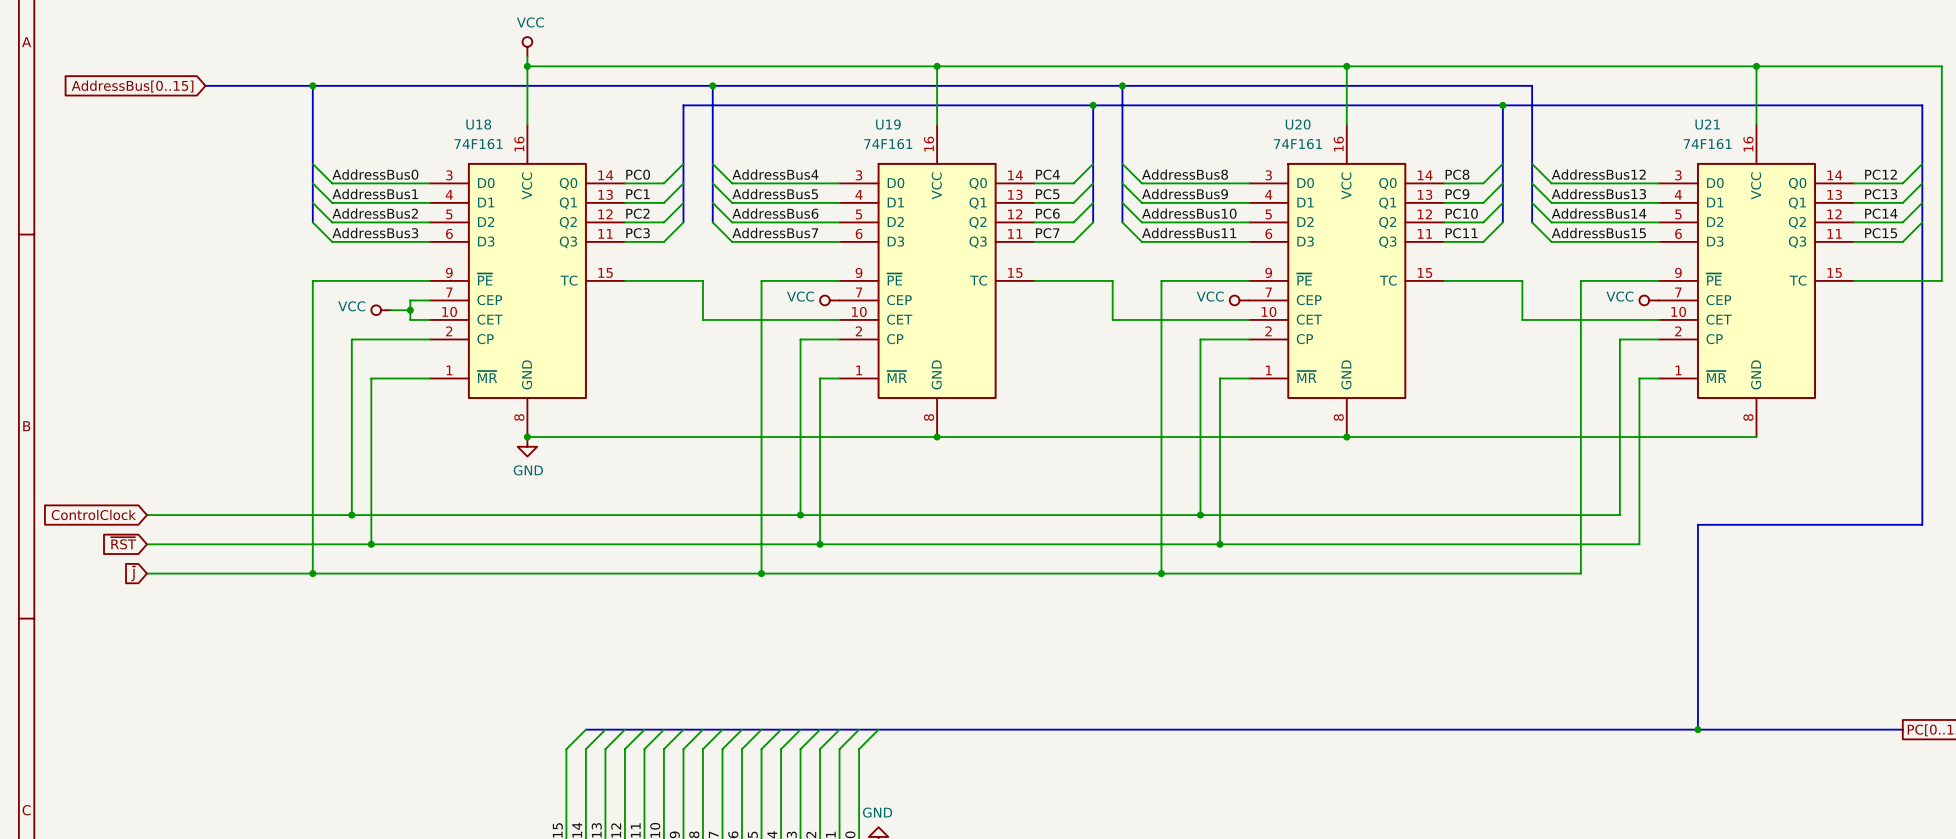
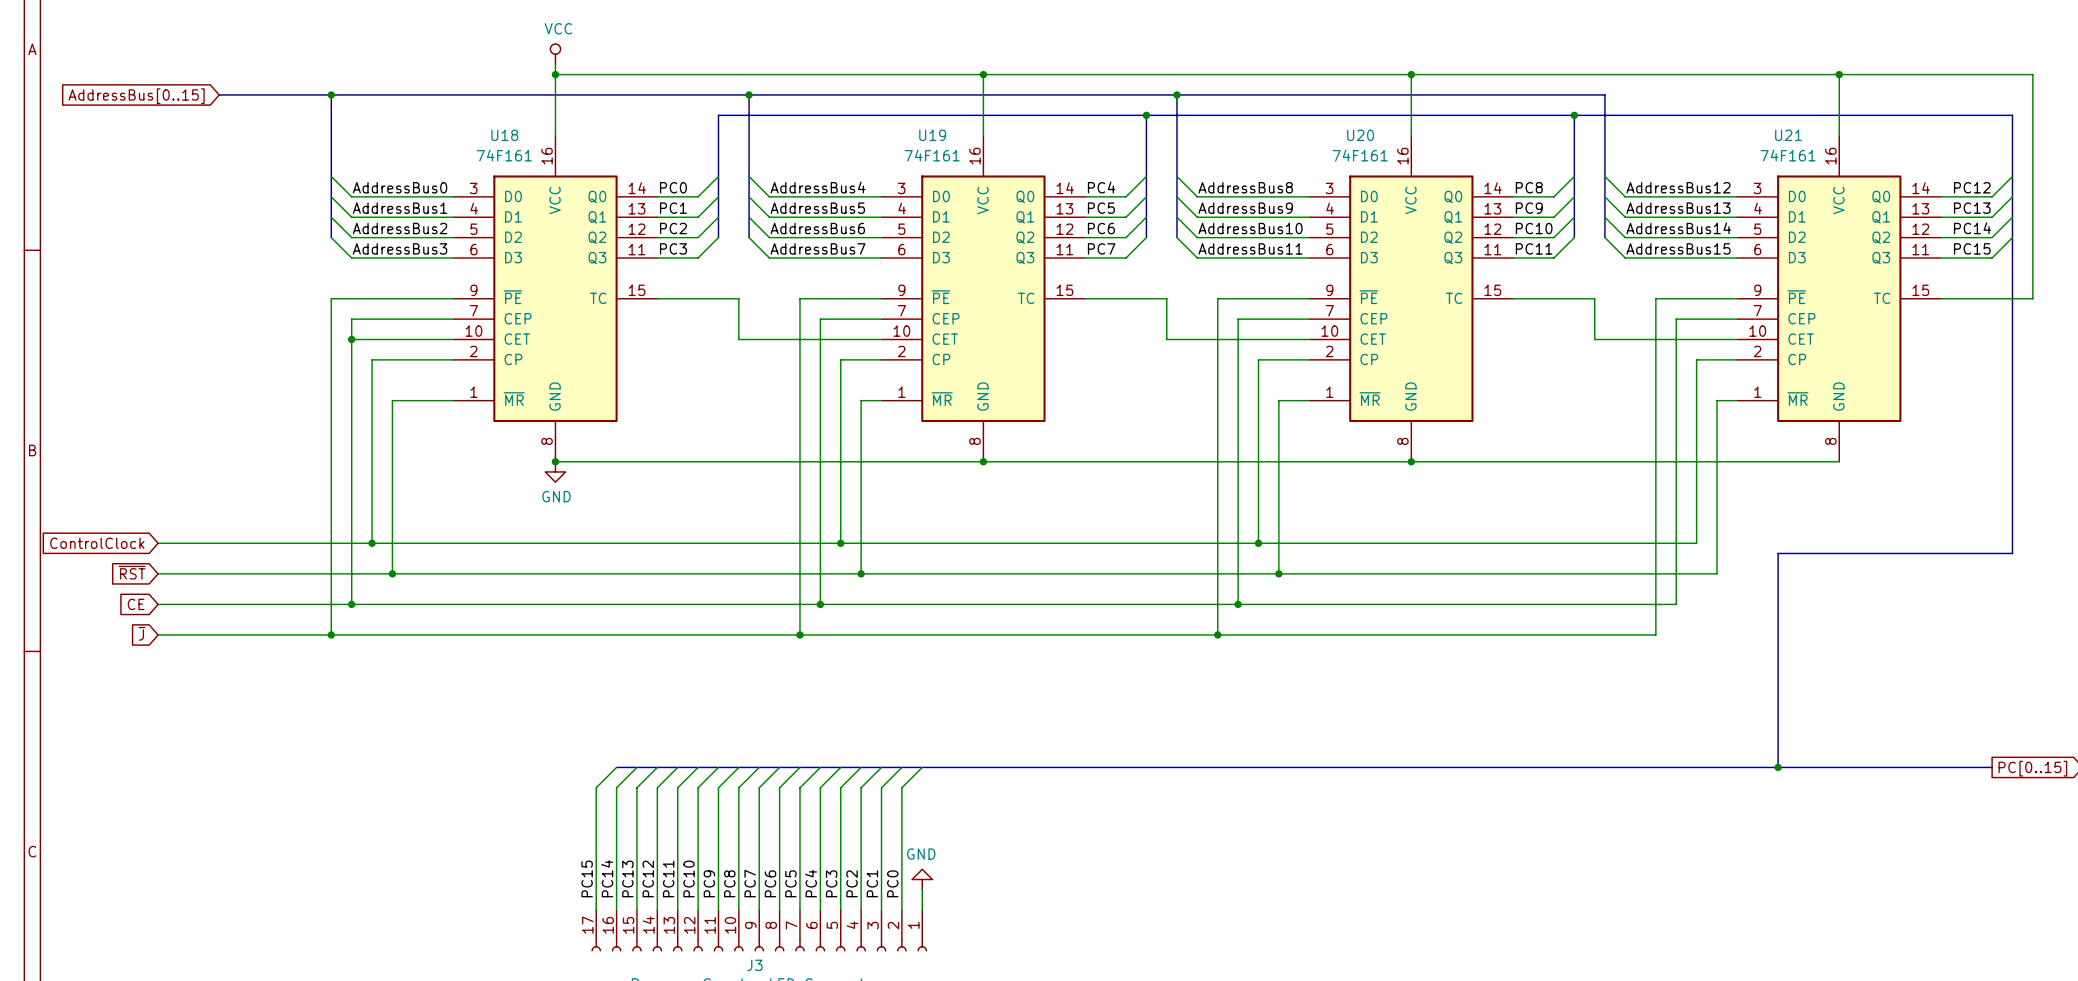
wire: (410, 300) (410, 319) -> (351, 339) (433, 339)
wire: none -> (433, 319) (351, 319) (351, 604)
power symbol: VCC (829, 300) -> none
wire: none -> (881, 319) (820, 319) (820, 604)
power symbol: VCC (1239, 300) -> none
wire: none -> (1309, 319) (1238, 319) (1238, 604)
power symbol: VCC (1649, 300) -> none
wire: none -> (1737, 319) (1676, 319) (1676, 604) (1655, 604) (1655, 634) (158, 634)
power symbol: VCC (381, 310) -> none
wire: (390, 310) (410, 310) -> none
junction: (410, 310) -> none
junction: none -> (351, 339)
global label: ~{J} (133, 573) -> CE (136, 604)
wire: none -> (331, 604) (331, 634)
junction: (312, 573) -> none
junction: none -> (351, 604)
wire: none -> (799, 604) (799, 634)
junction: (761, 573) -> none
junction: none -> (820, 604)
wire: none -> (1217, 604) (1217, 634)
junction: (1161, 573) -> none
junction: none -> (1238, 604)
junction: none -> (331, 634)
junction: none -> (799, 634)
junction: none -> (1217, 634)
global label: none -> ~{J} (141, 633)

